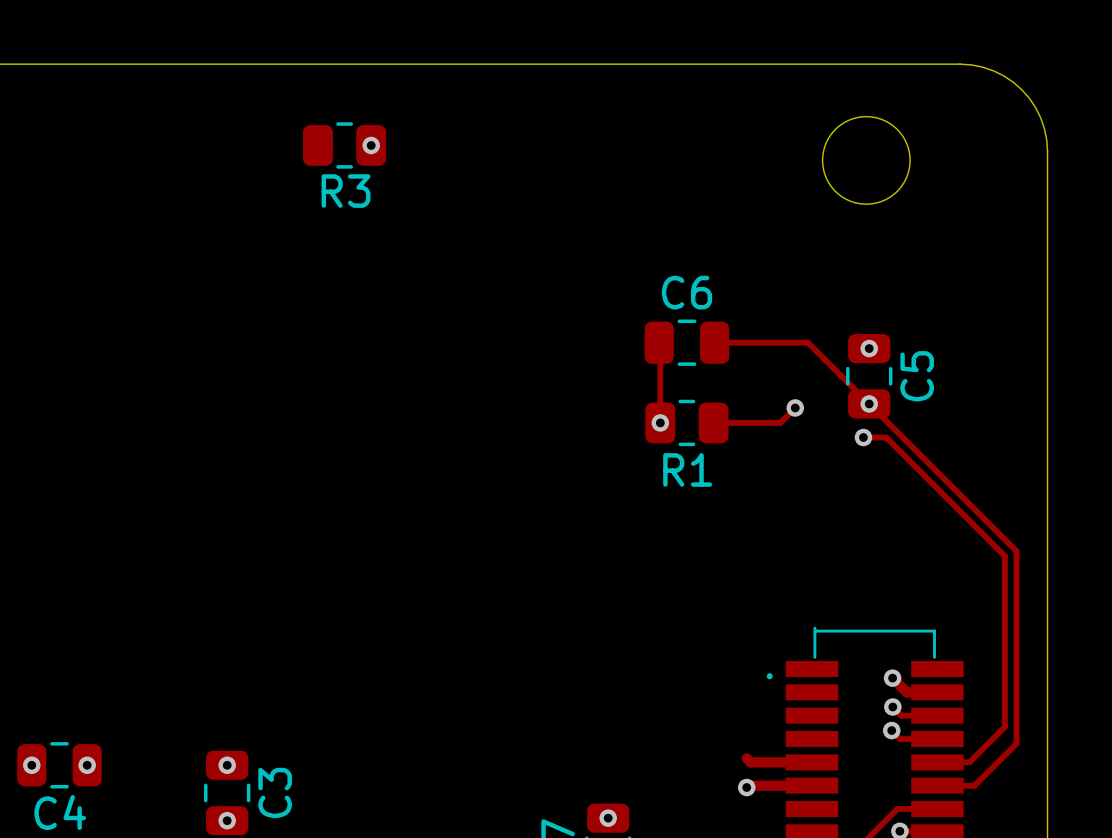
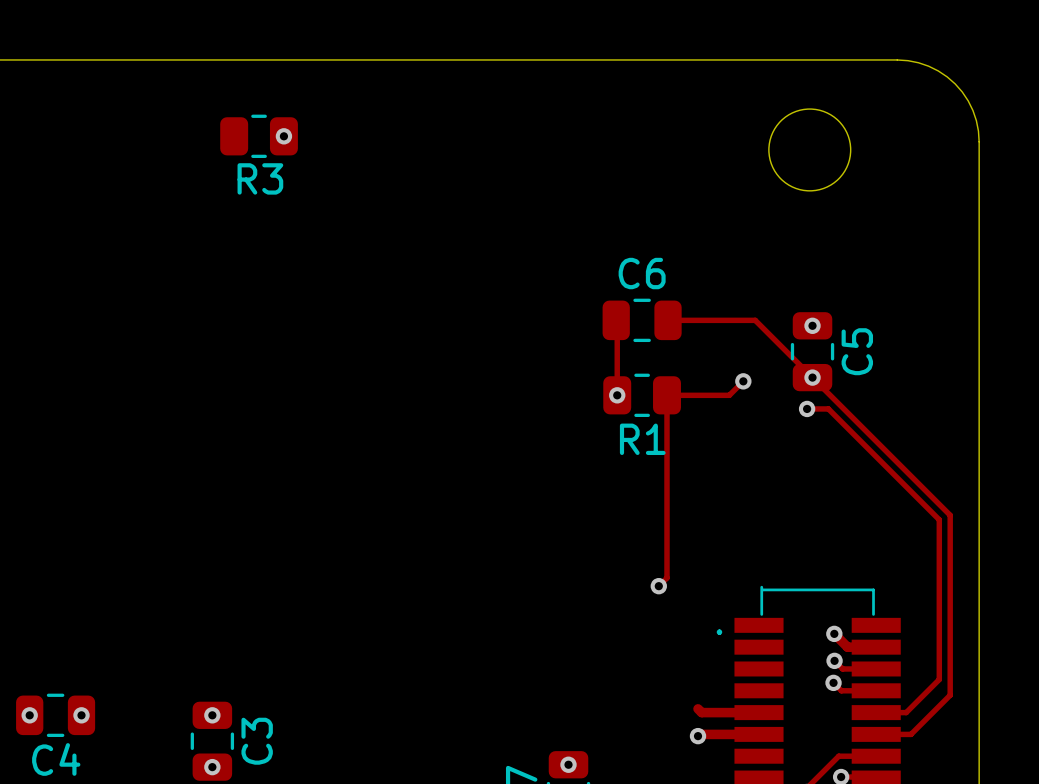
R3 position: (344, 145) -> (259, 136)
via position: (371, 145) -> (283, 136)
track: none -> (666, 395) (666, 577) (658, 586)
via: none -> (658, 586)

